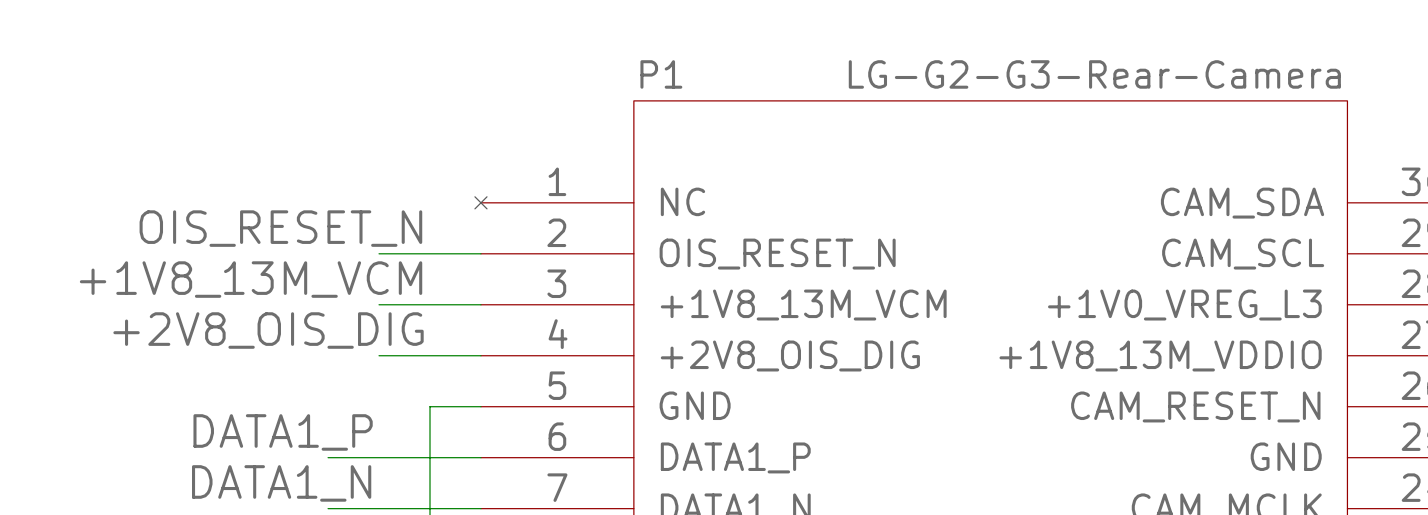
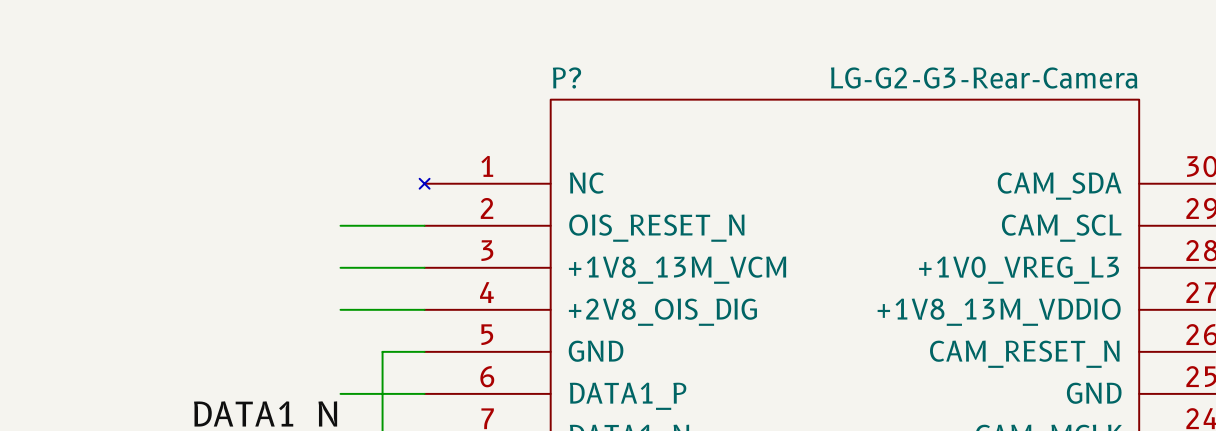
P1 name: P1 (661, 74) -> P? (566, 77)
label: OIS_RESET_N (280, 228) -> none
label: +1V8_13M_VCM (251, 279) -> none
label: +2V8_OIS_DIG (268, 330) -> none
label: DATA1_P (283, 432) -> none
wire: (328, 457) (379, 457) -> none

